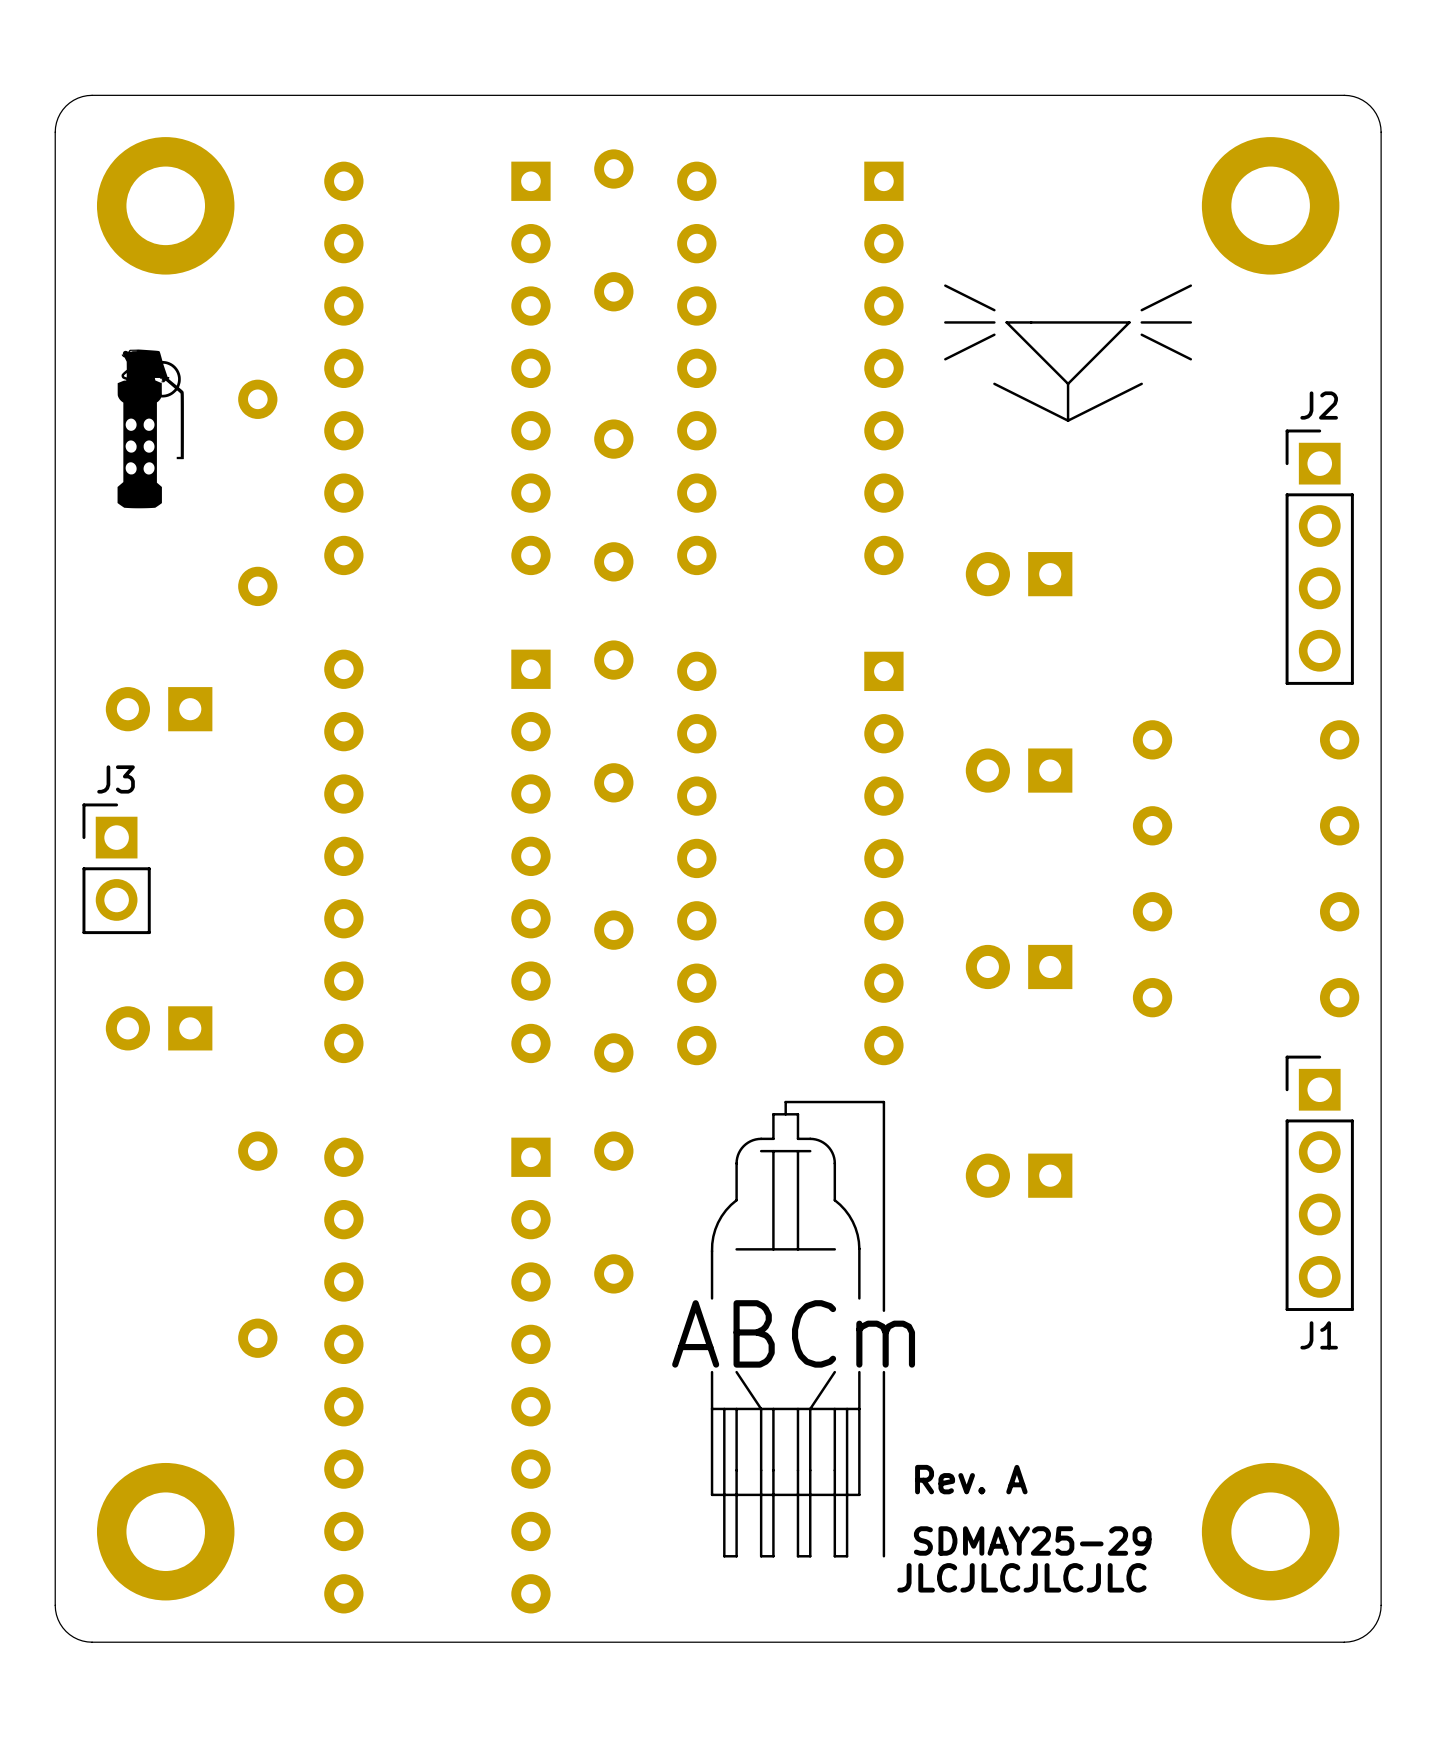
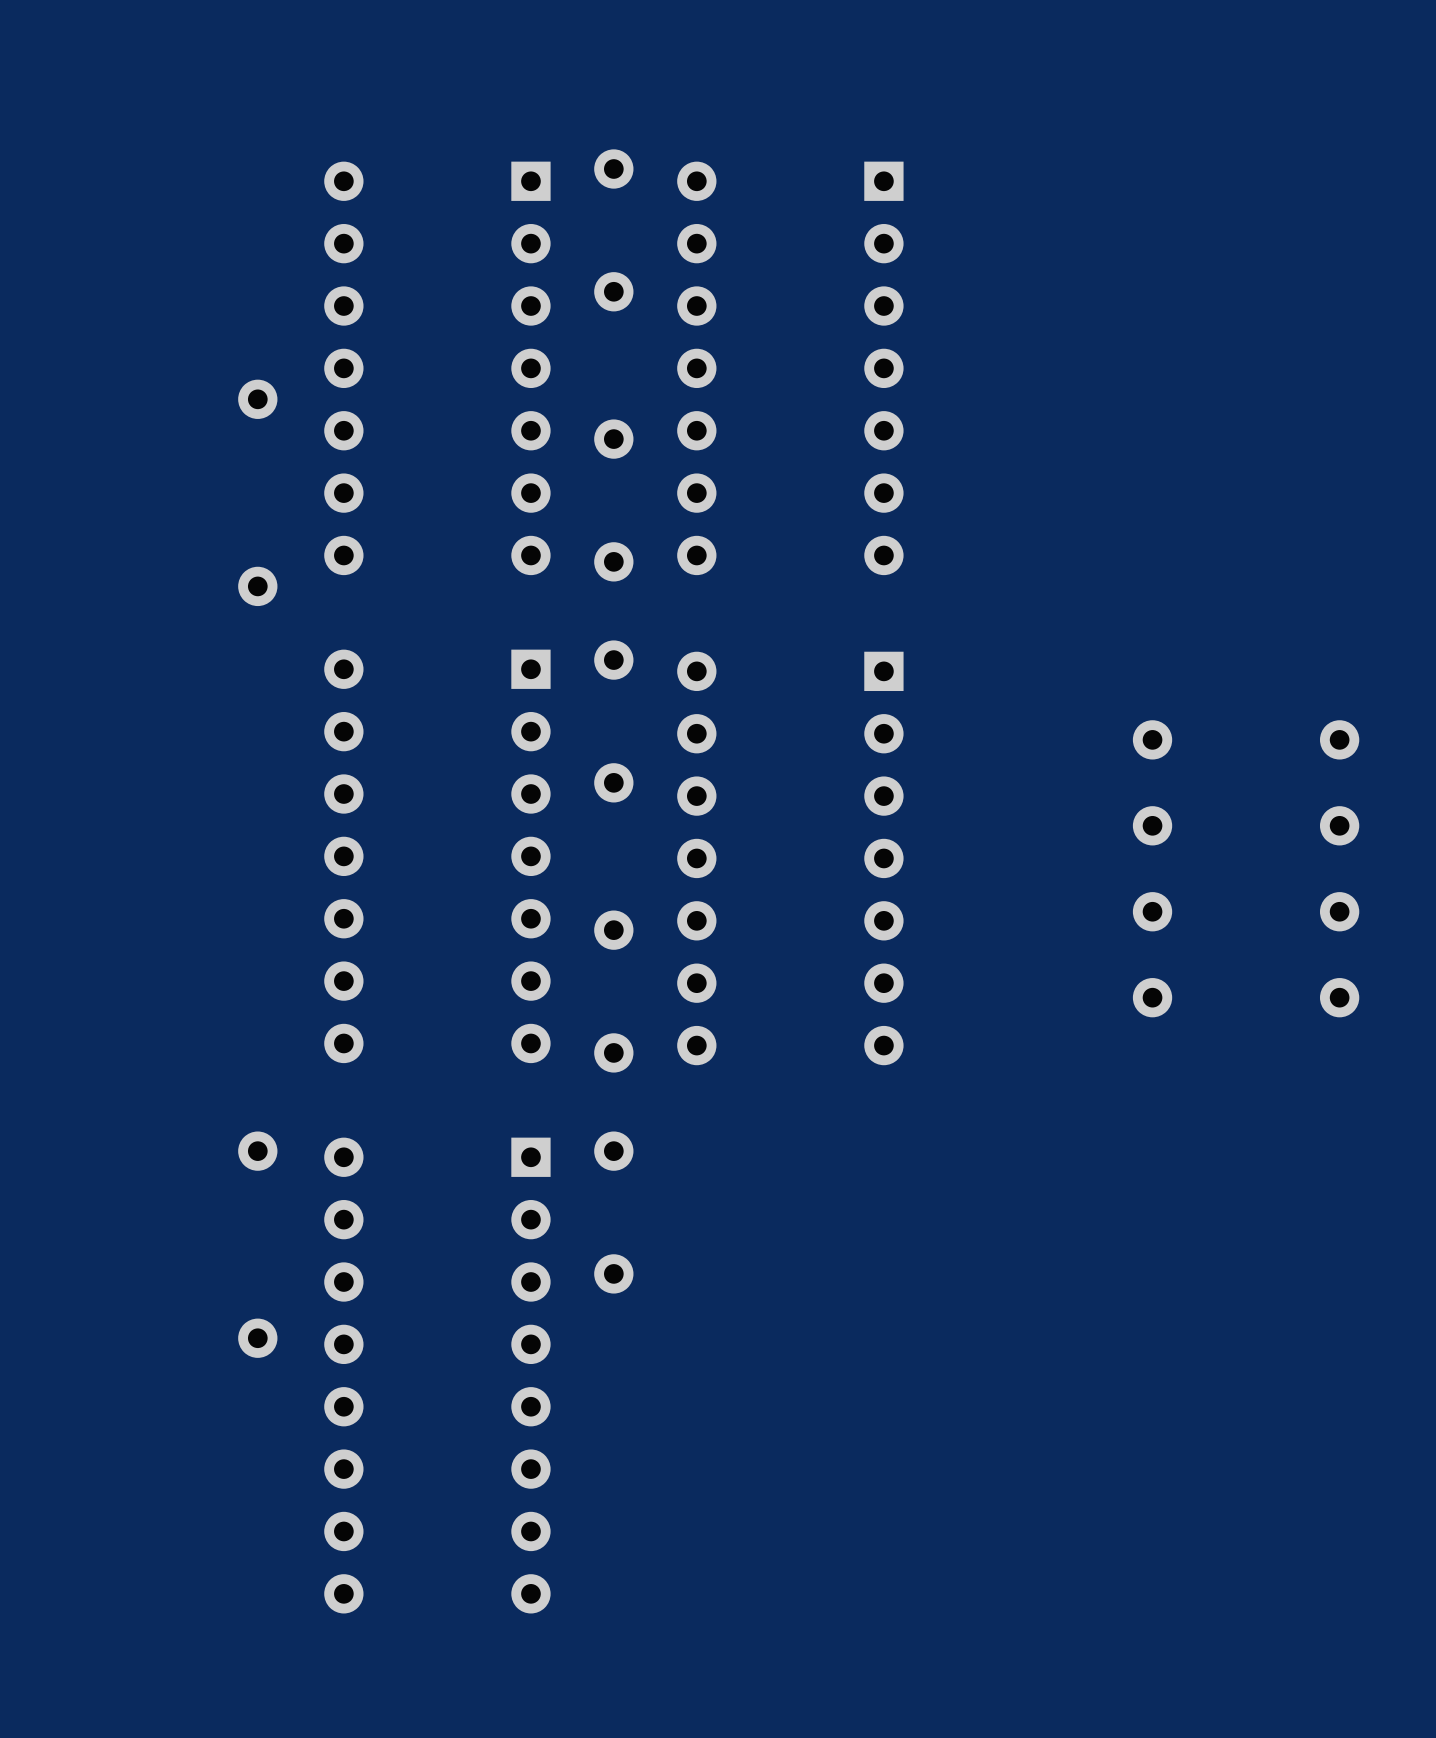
board edge: (1344, 95) (92, 95) (73, 100) (62, 109) (58, 118) (55, 132) (55, 1605) (58, 1619) (69, 1634) (82, 1640) (92, 1642) (1344, 1642) (1358, 1639) (1373, 1627) (1379, 1614) (1381, 1605) (1381, 132) (1378, 118) (1370, 106) (1358, 98) (1344, 95) -> none
part: (165, 205) -> none
part: (1270, 205) -> none
drawing: [944, 284, 1193, 422] -> none
drawing: [117, 349, 184, 509] -> none
J2: (1319, 557) -> none
part: (1019, 574) -> none
part: (159, 709) -> none
part: (1019, 770) -> none
J3: (116, 868) -> none
part: (1019, 966) -> none
part: (159, 1028) -> none
drawing: [710, 1100, 886, 1558] -> none
part: (1019, 1175) -> none
J1: (1319, 1183) -> none
text: Rev. A (971, 1479) -> none
part: (165, 1531) -> none
part: (1270, 1531) -> none
text: SDMAY25-29 (1032, 1540) -> none
text: JLCJLCJLCJLC (1021, 1577) -> none

